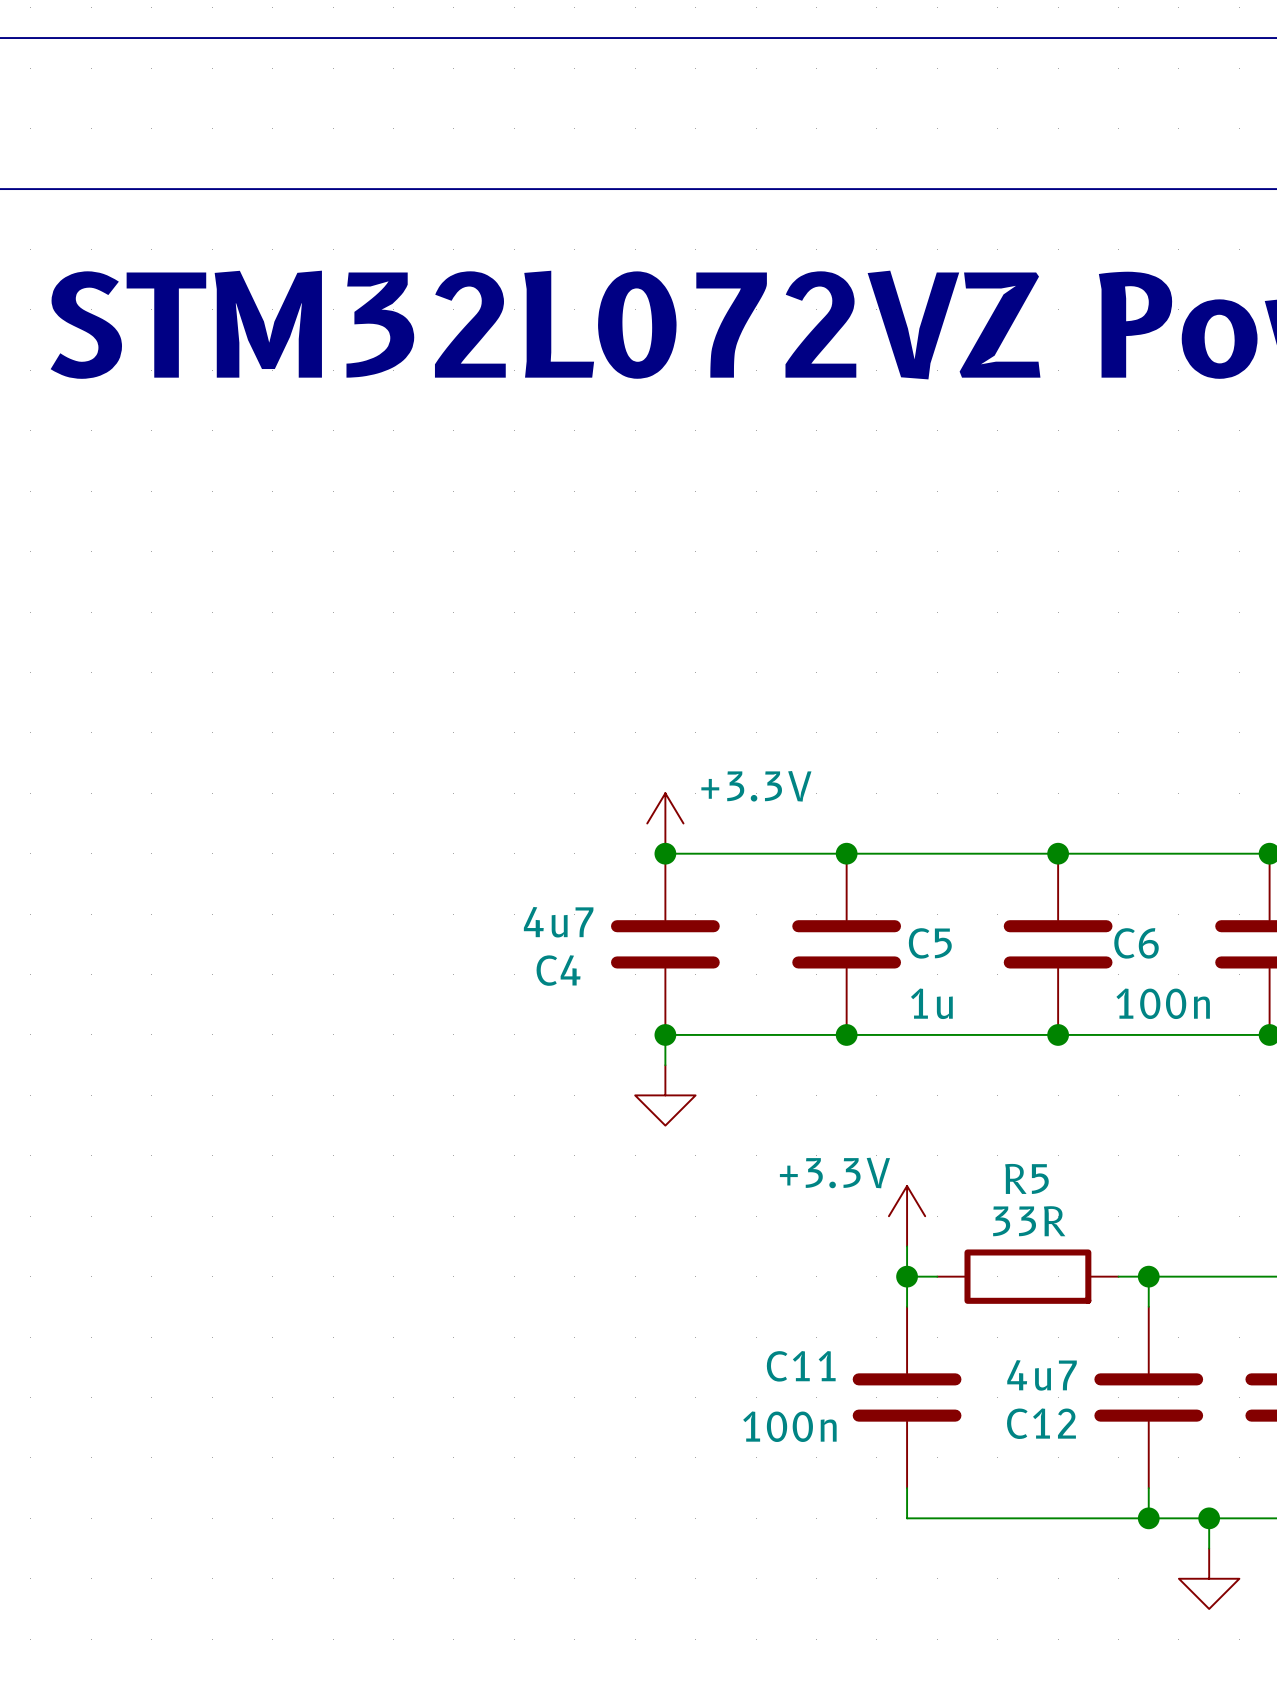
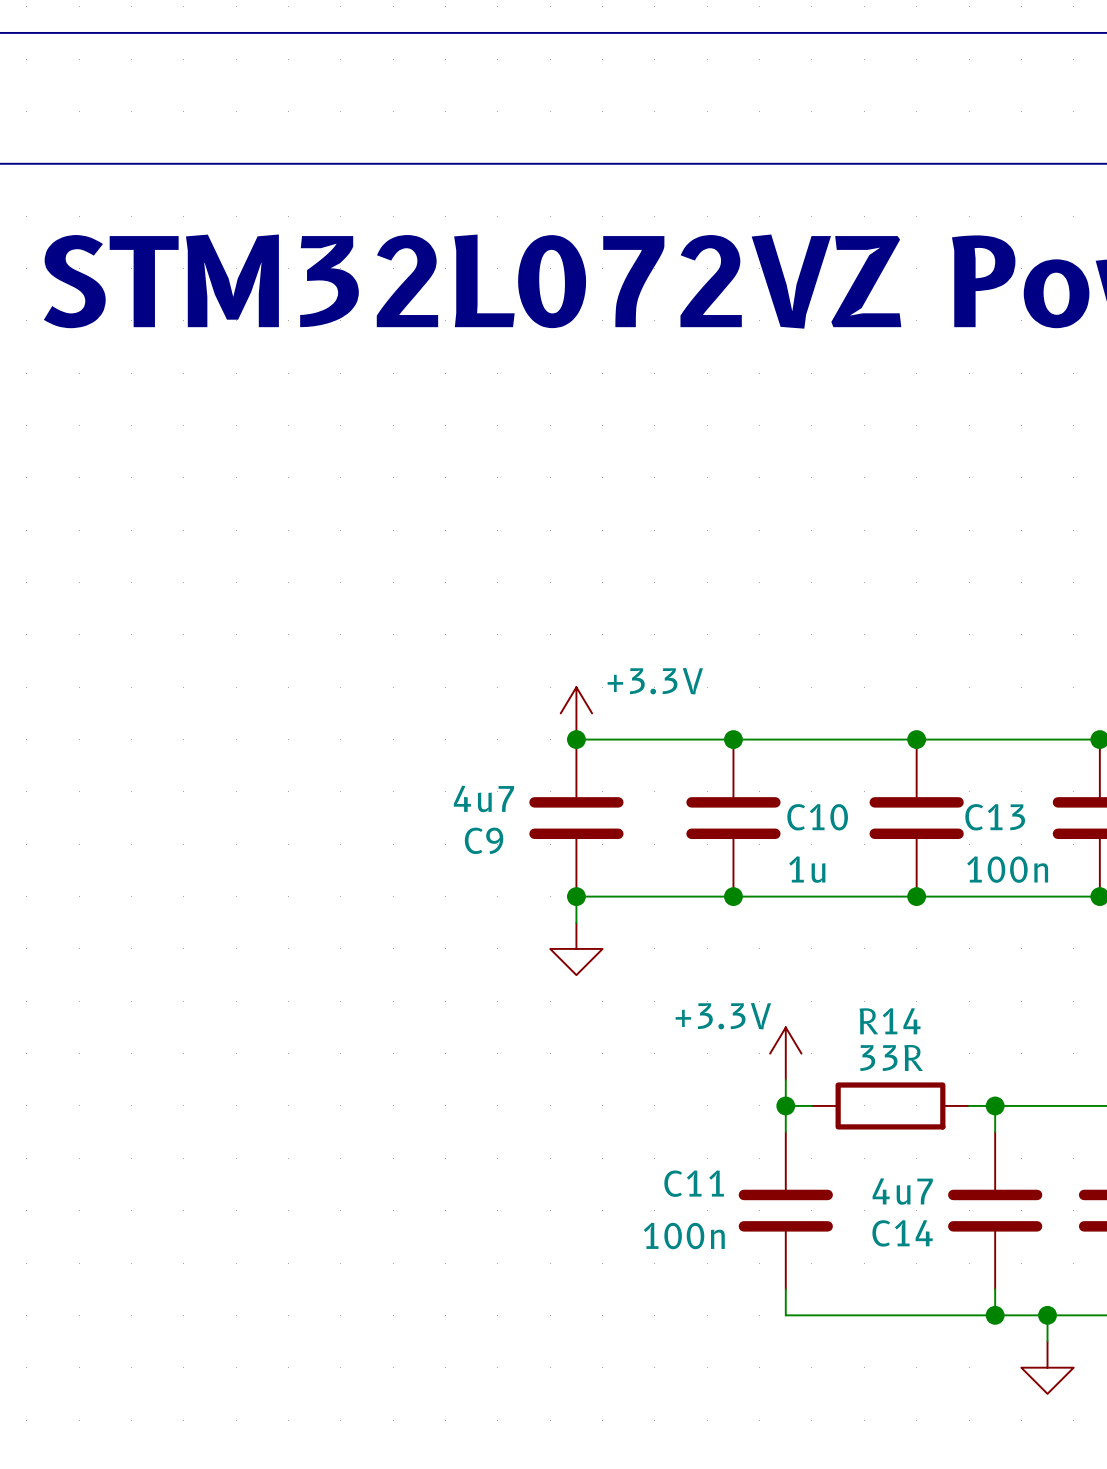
C5 name: C5 (930, 943) -> C10 (817, 817)
C6 name: C6 (1136, 943) -> C13 (995, 817)
C4 name: C4 (558, 970) -> C9 (484, 840)
R5 name: R5 (1026, 1178) -> R14 (890, 1021)
C12 name: C12 (1041, 1423) -> C14 (902, 1233)

